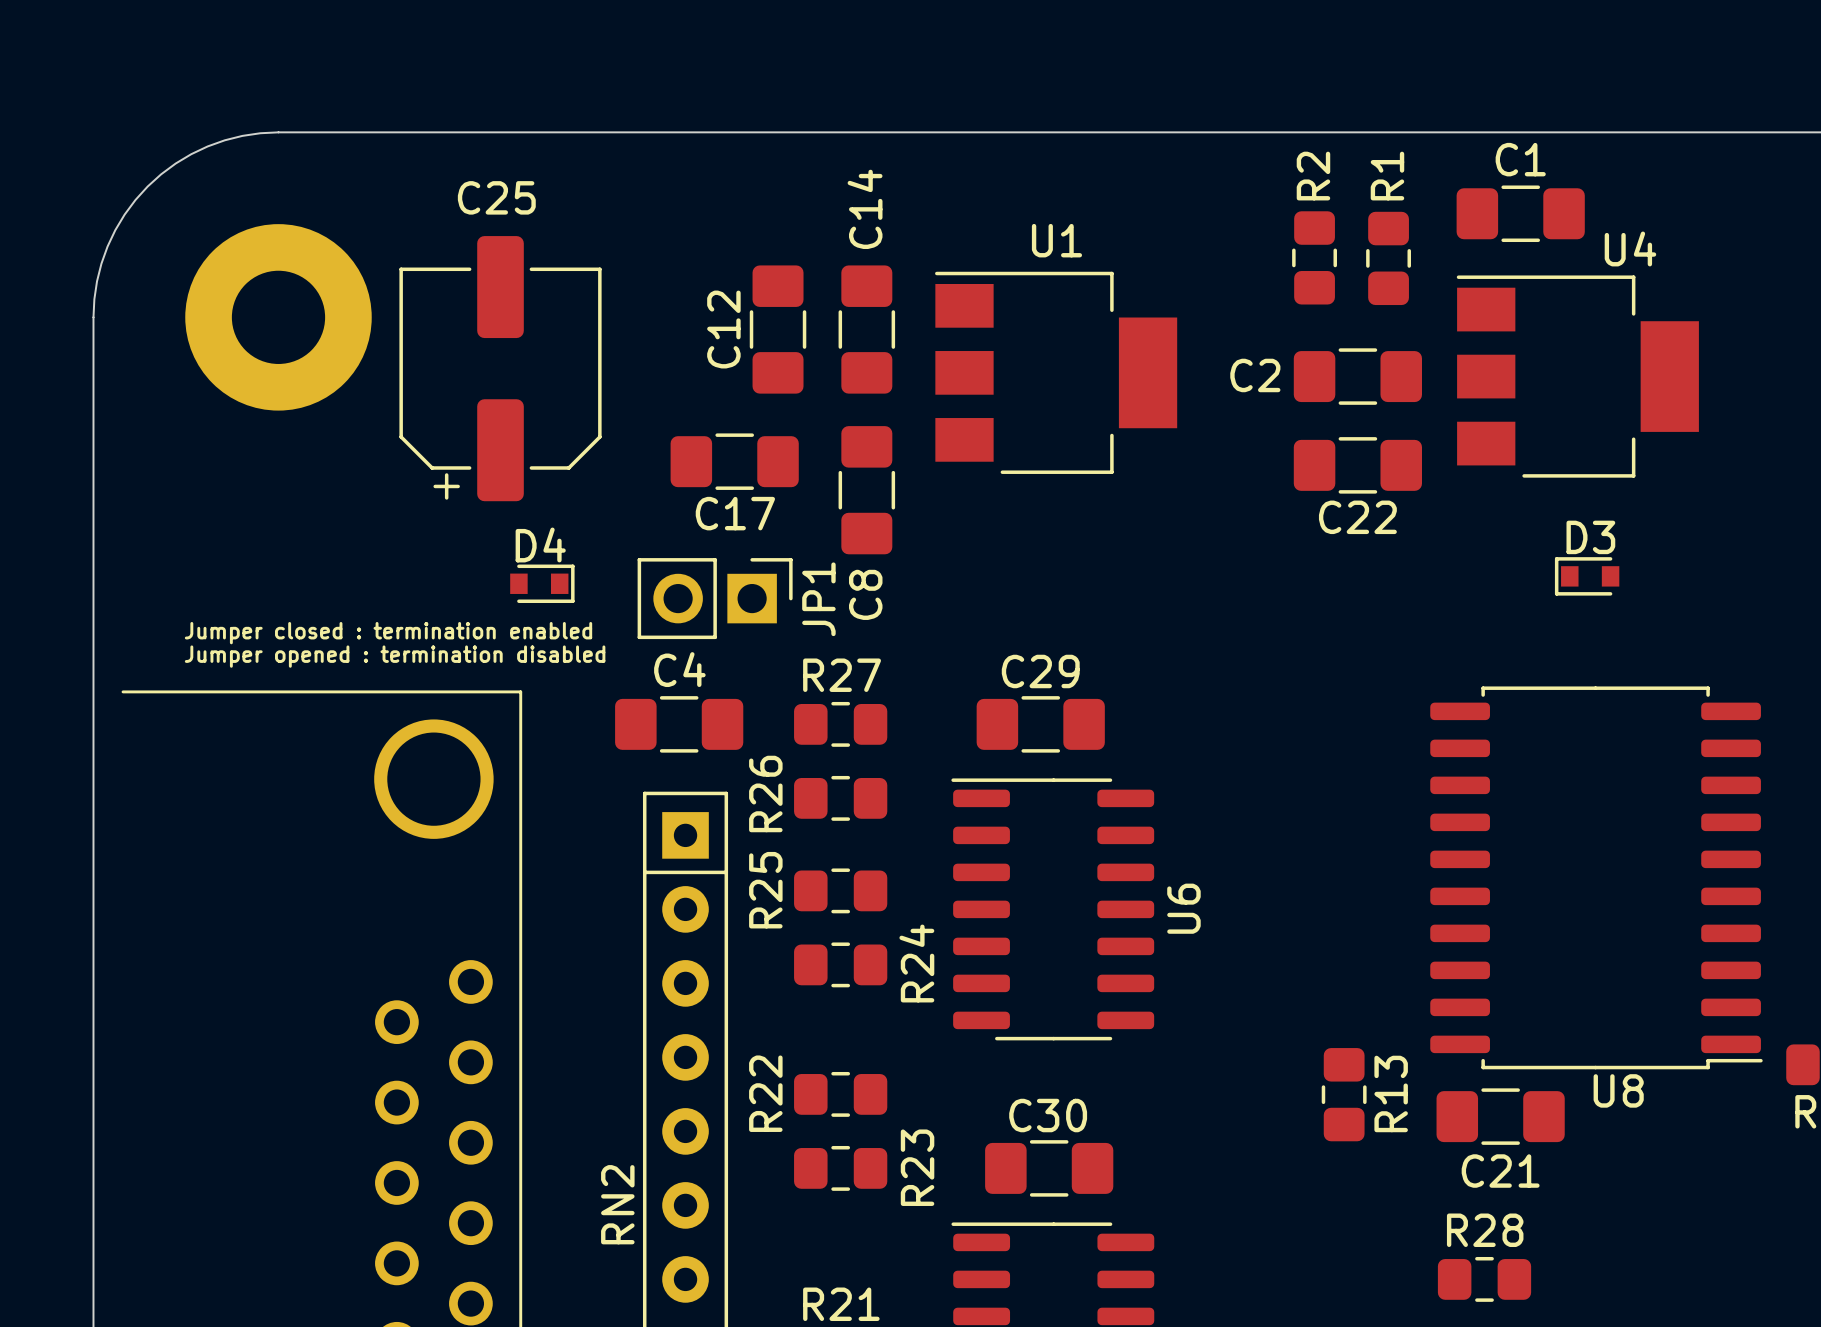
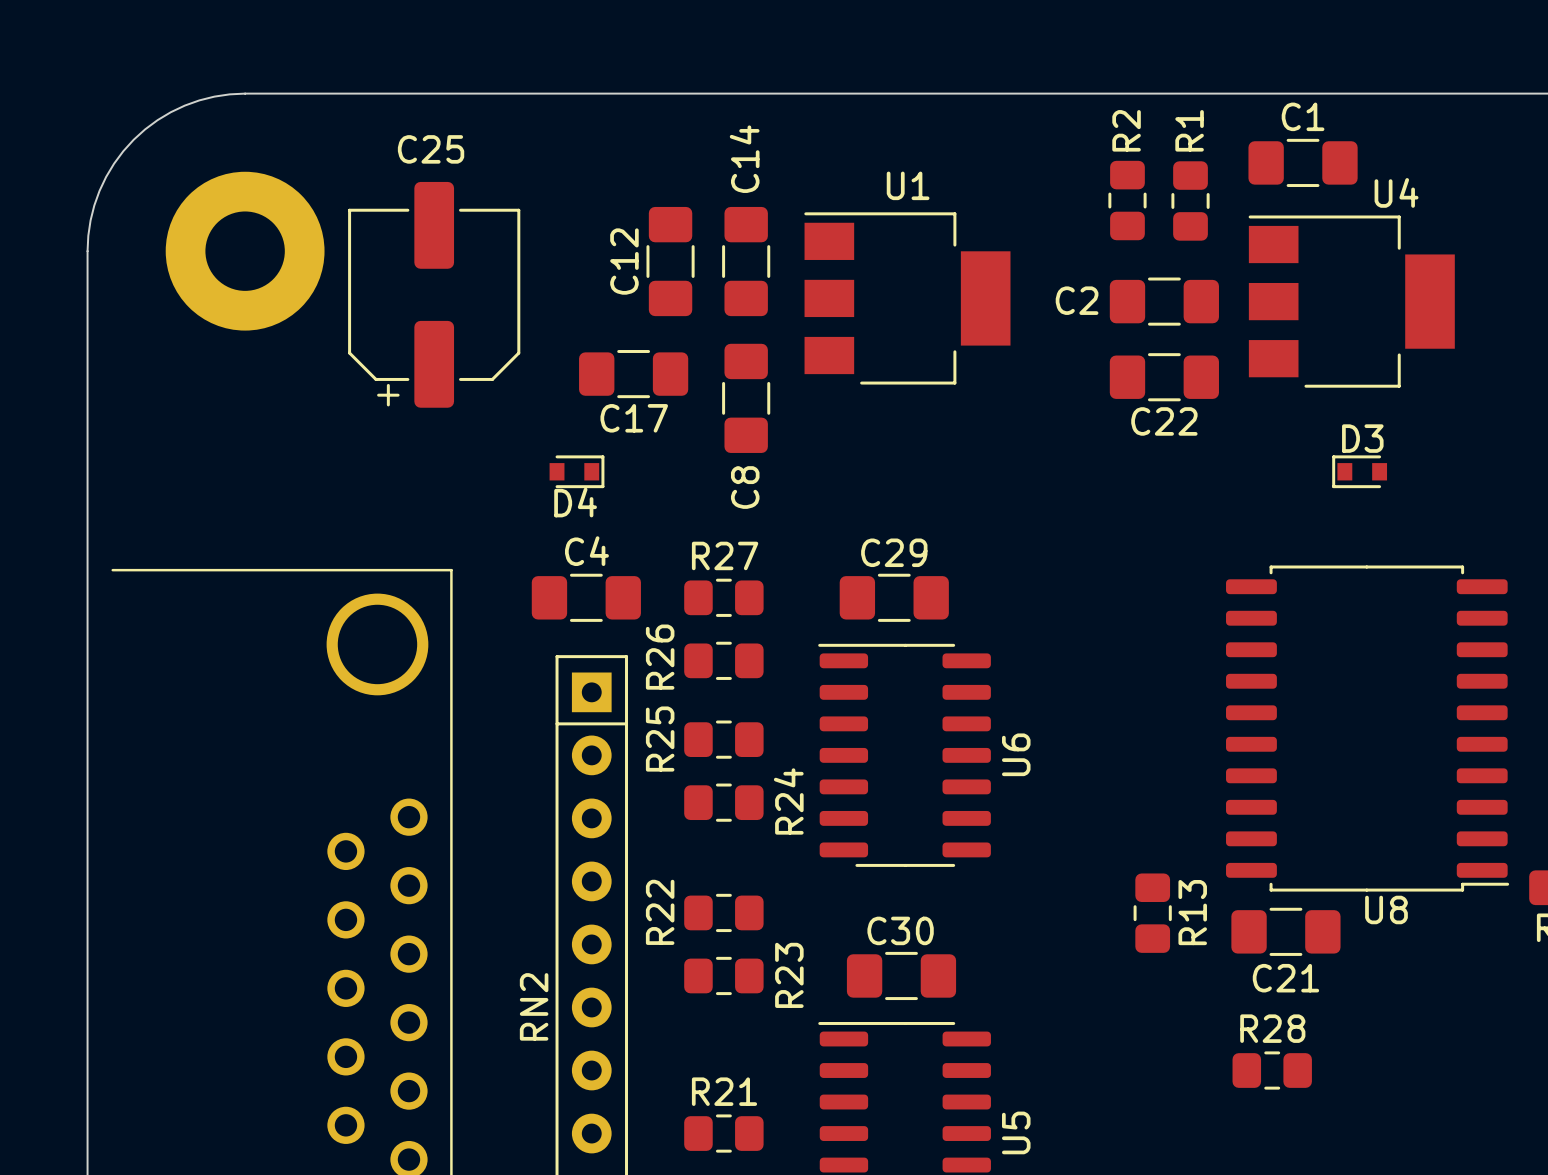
D4 name position: D4 (540, 544) -> D4 (575, 502)
D4 position: (542, 583) -> (577, 471)
JP1: (715, 598) -> none
text: Jumper closed : termination enabled (388, 633) -> none
text: Jumper opened : termination disabled (395, 656) -> none

